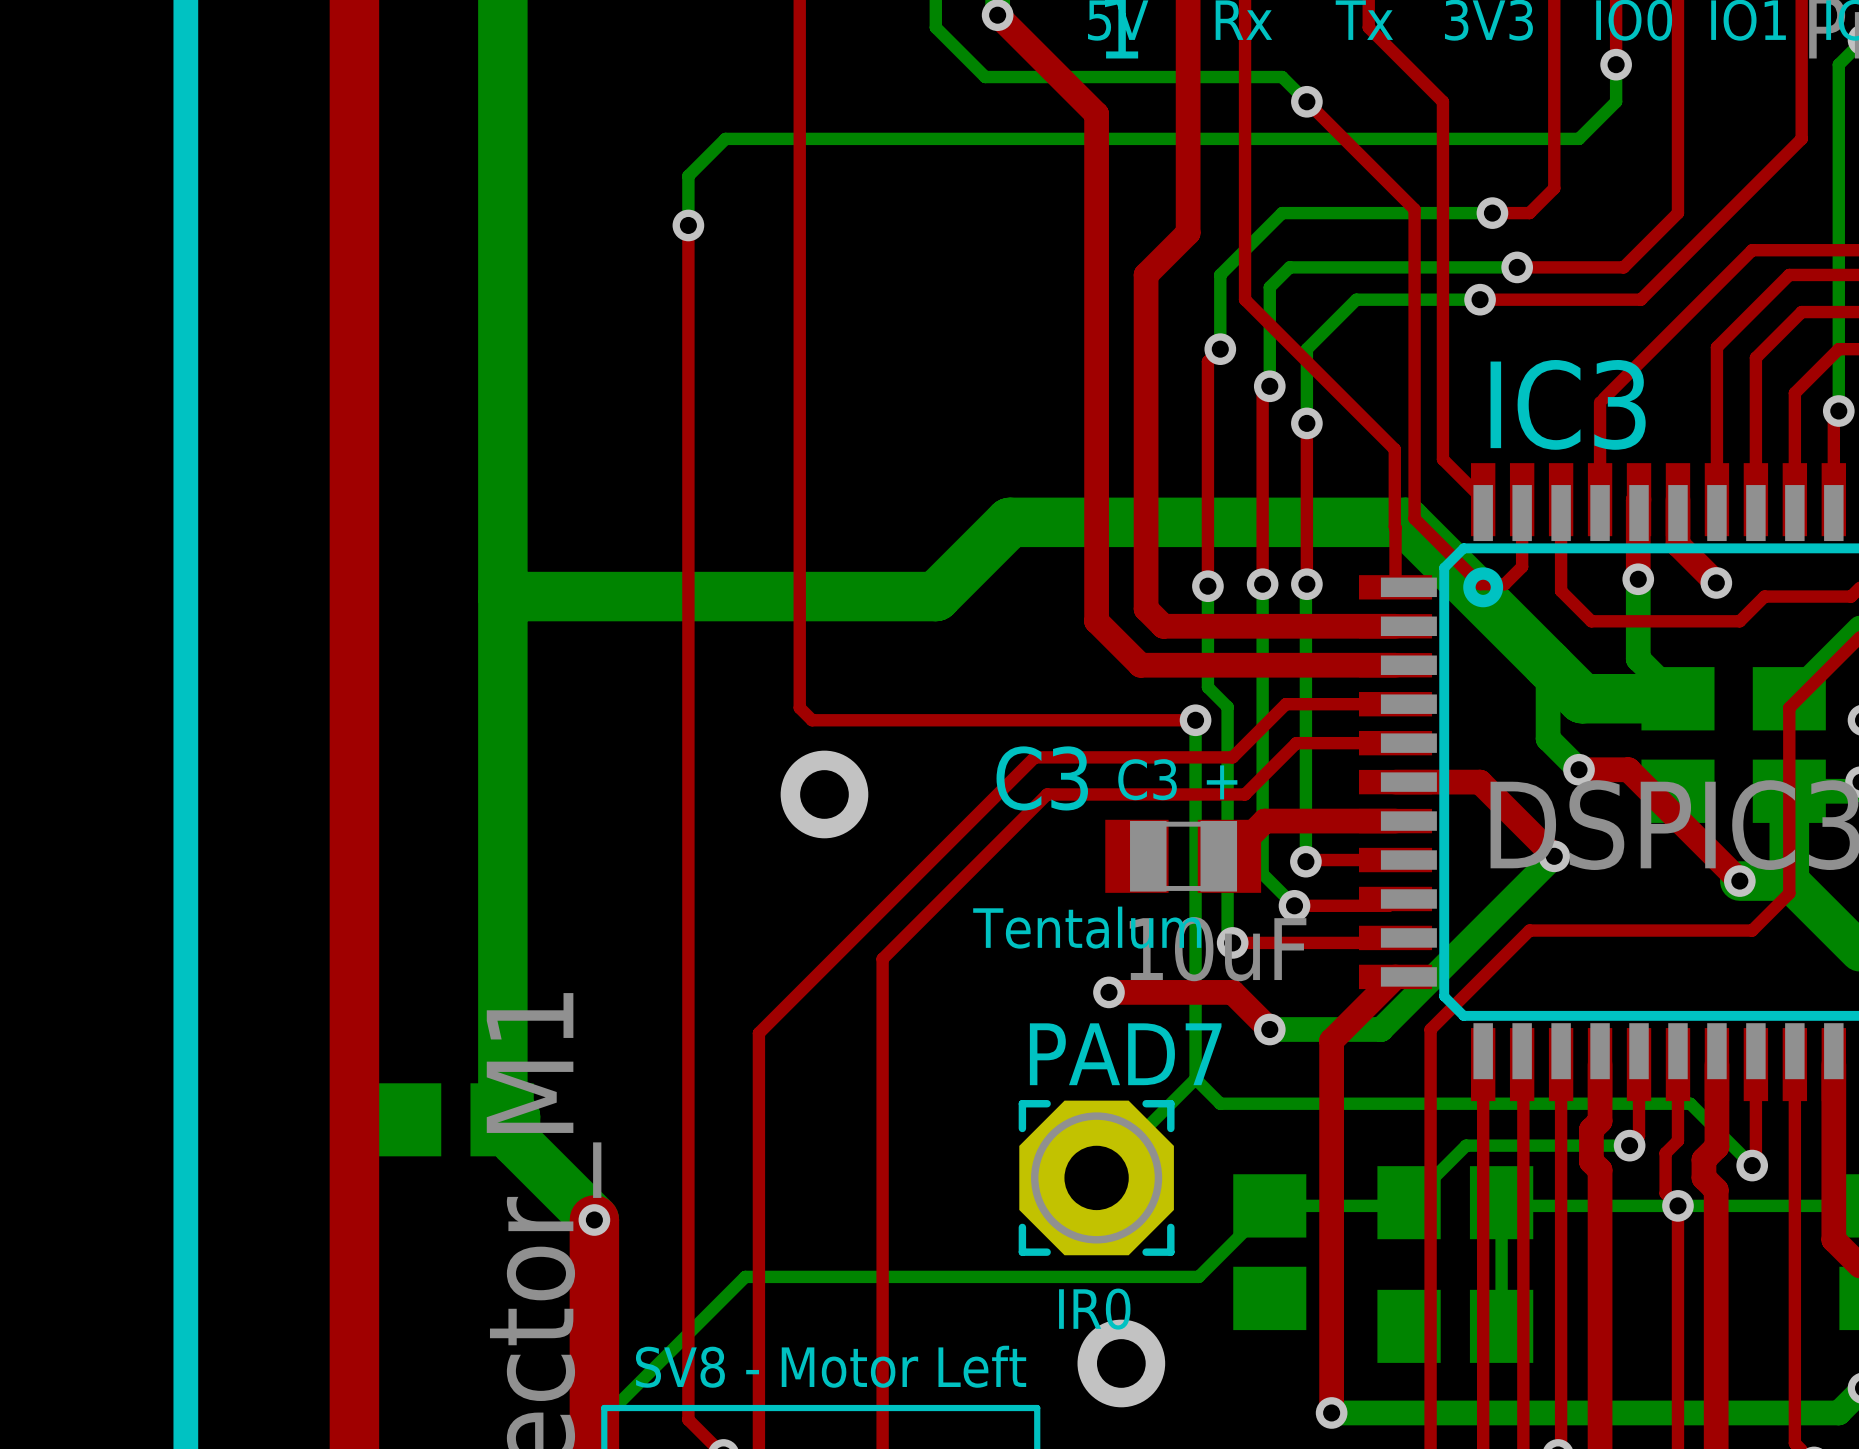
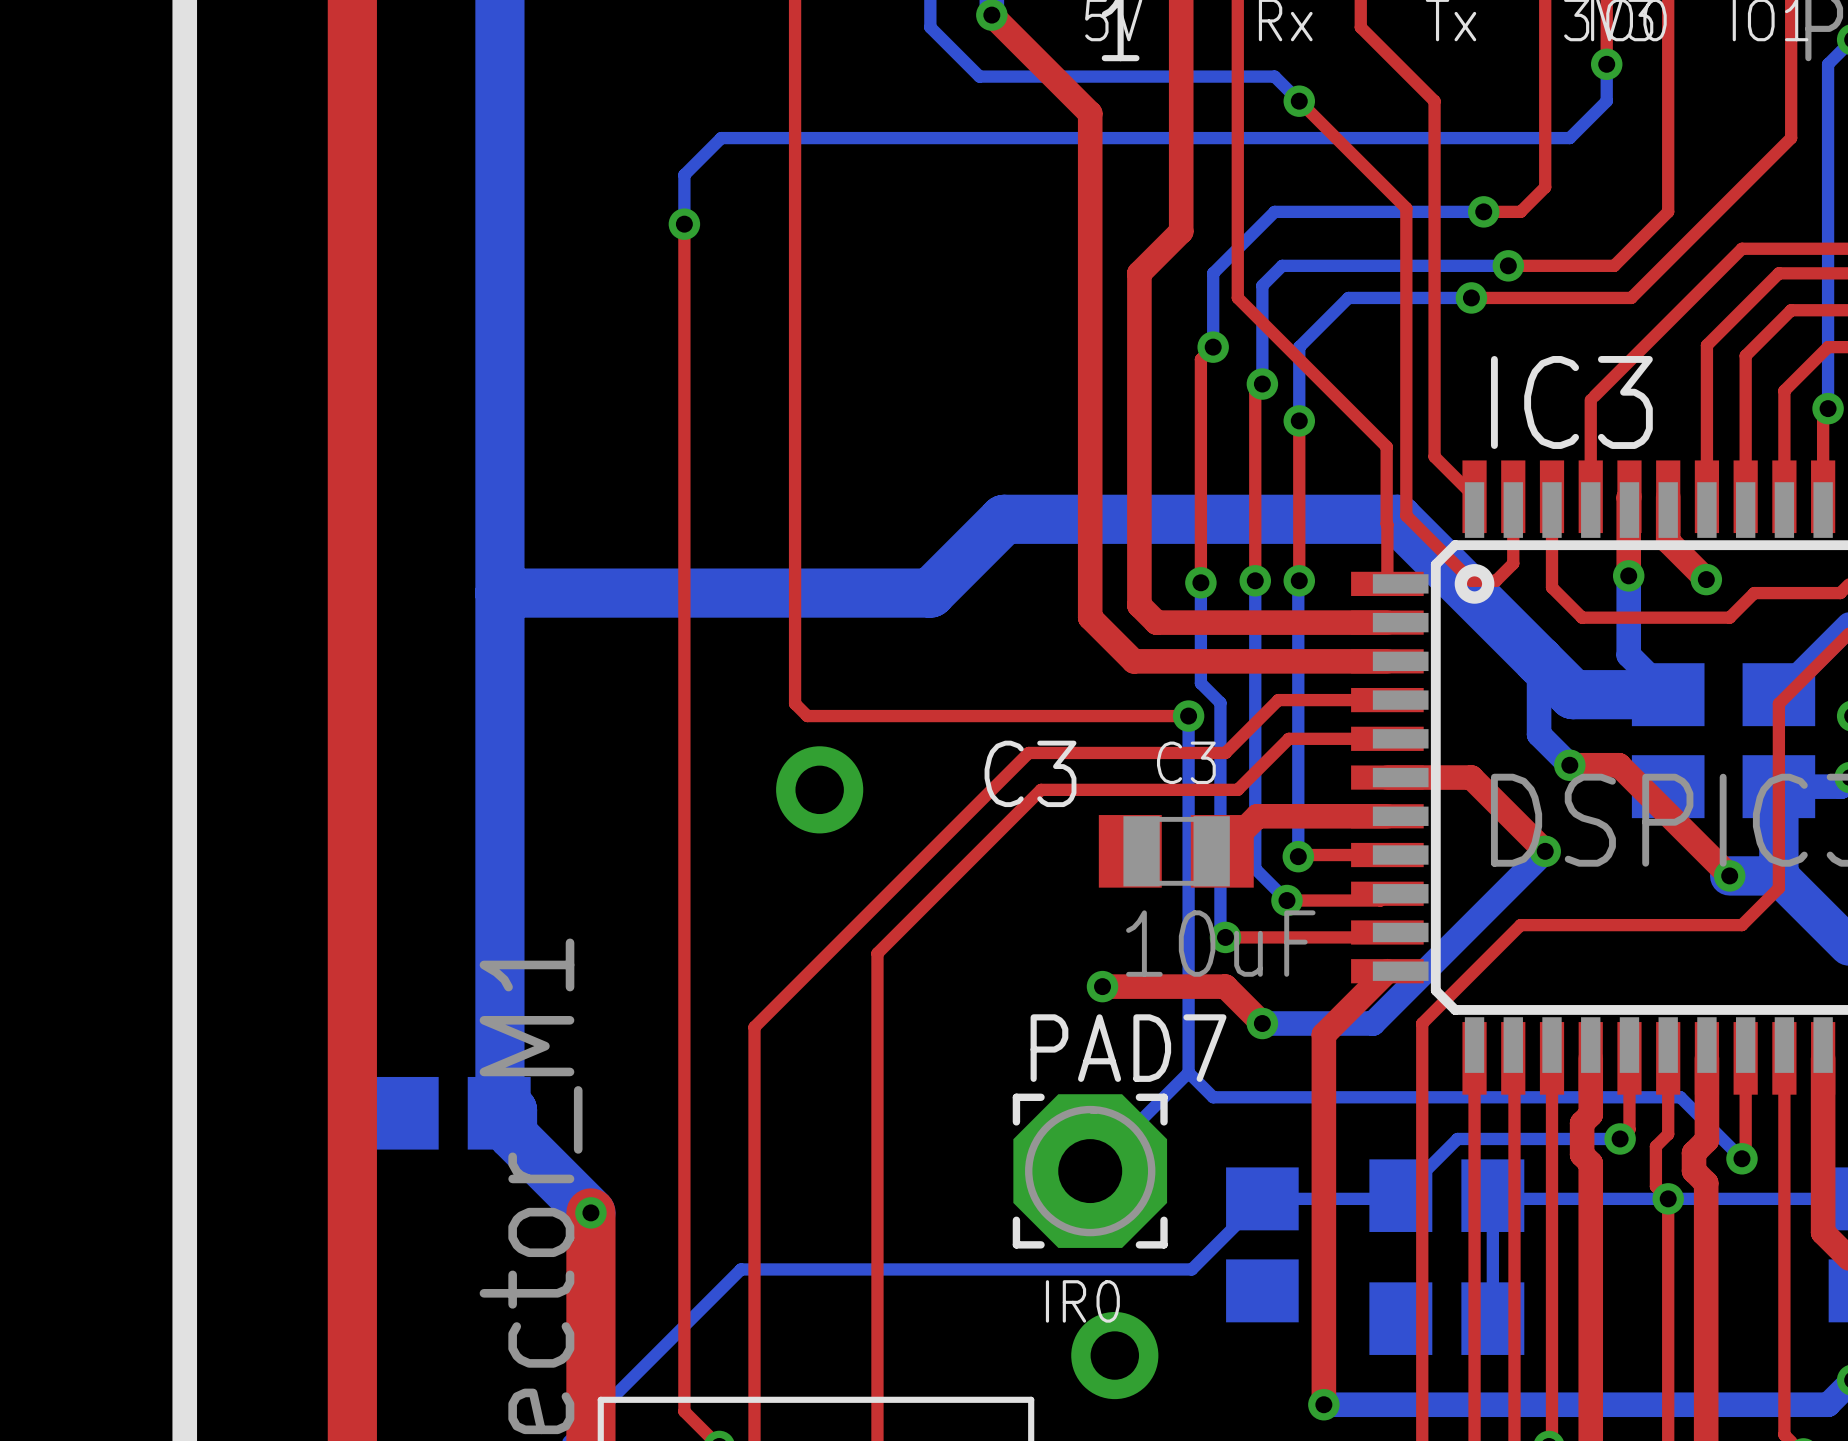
text: C3 (1147, 779) -> none
text: + (1222, 782) -> C3 (1186, 762)
text: Tentalum (1087, 927) -> none
text: SV8 - Motor Left (831, 1366) -> none

